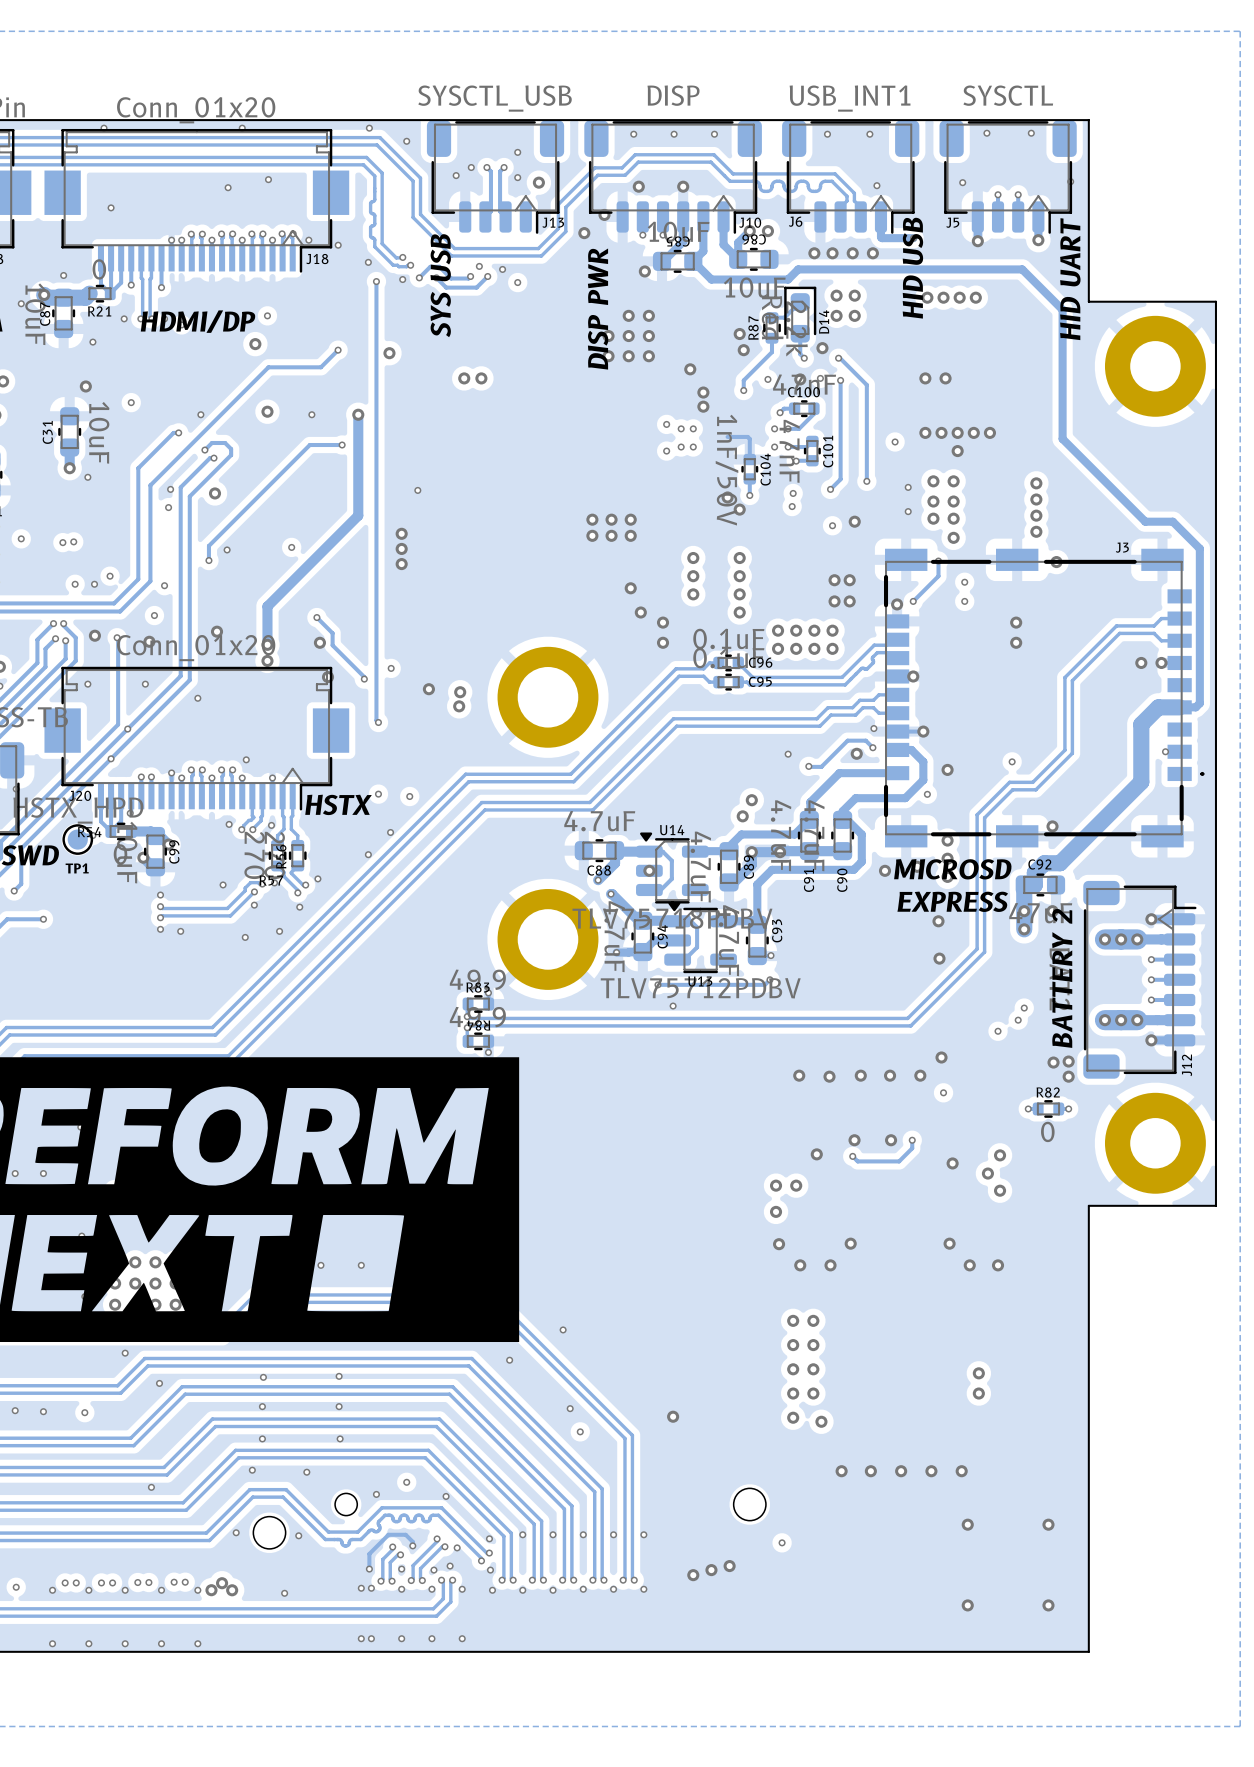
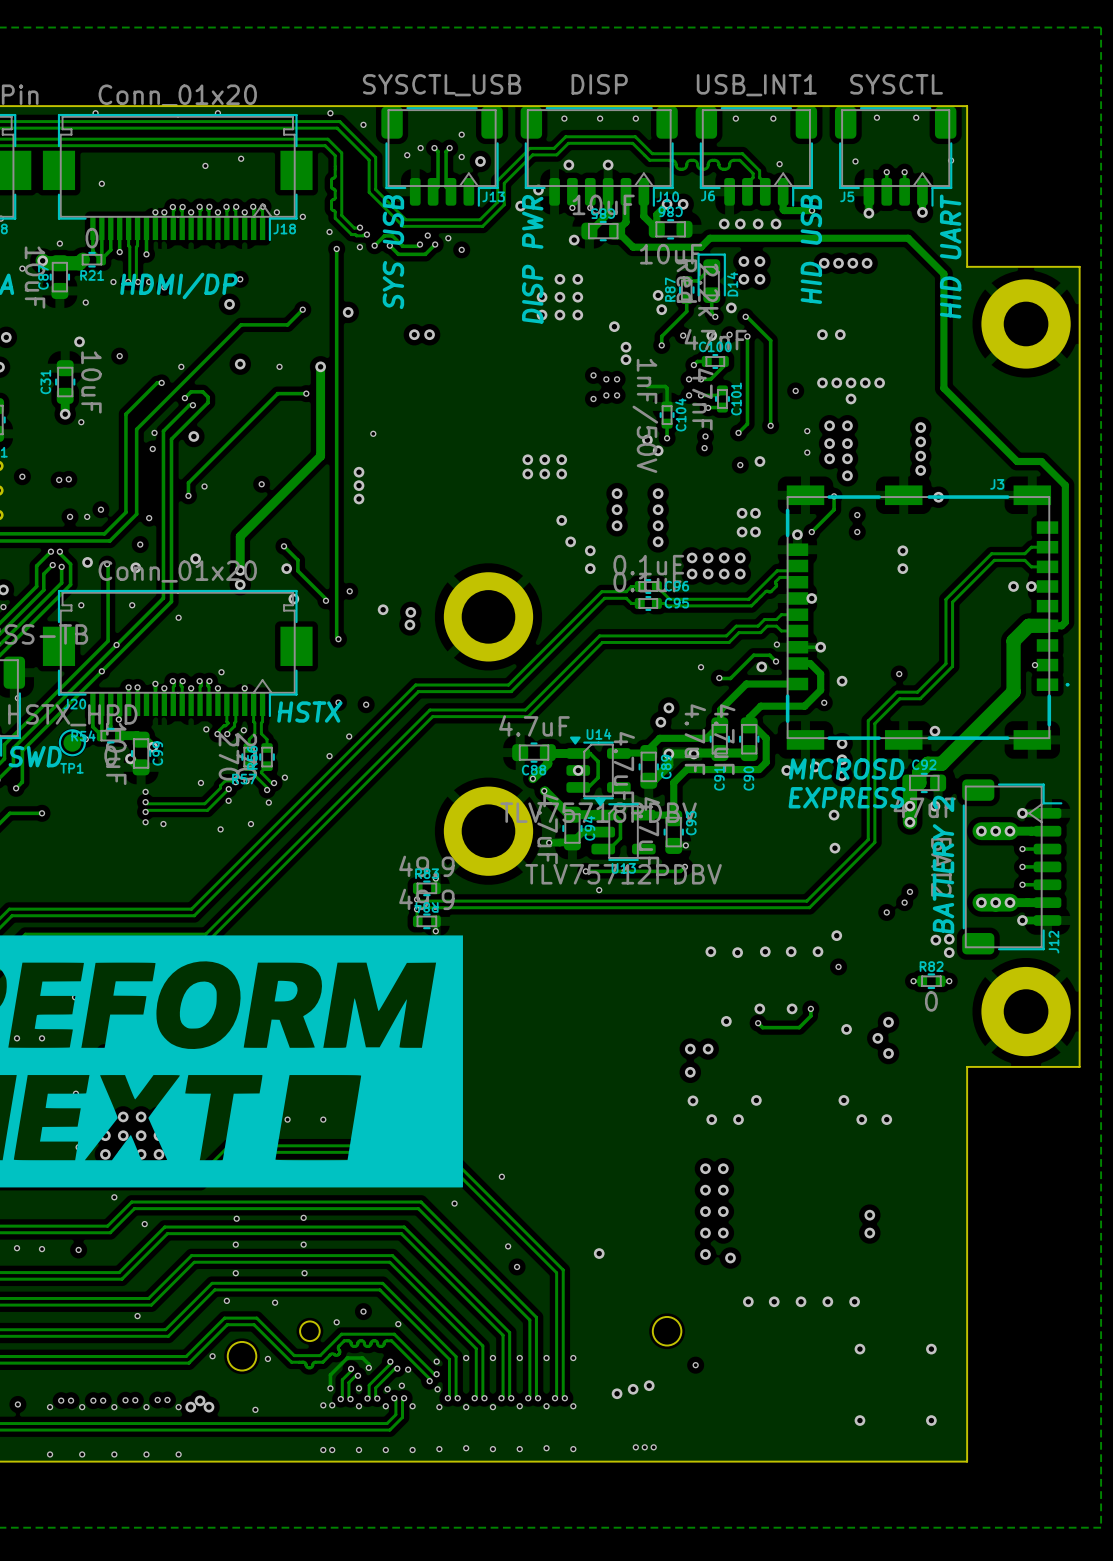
via: none -> (635, 1447)
via: none -> (644, 1447)
via: none -> (653, 1447)
via: none -> (466, 1448)
via: none -> (546, 1448)
via: none -> (439, 1449)
via: none -> (492, 1449)
via: none -> (519, 1449)
via: none -> (573, 1449)

